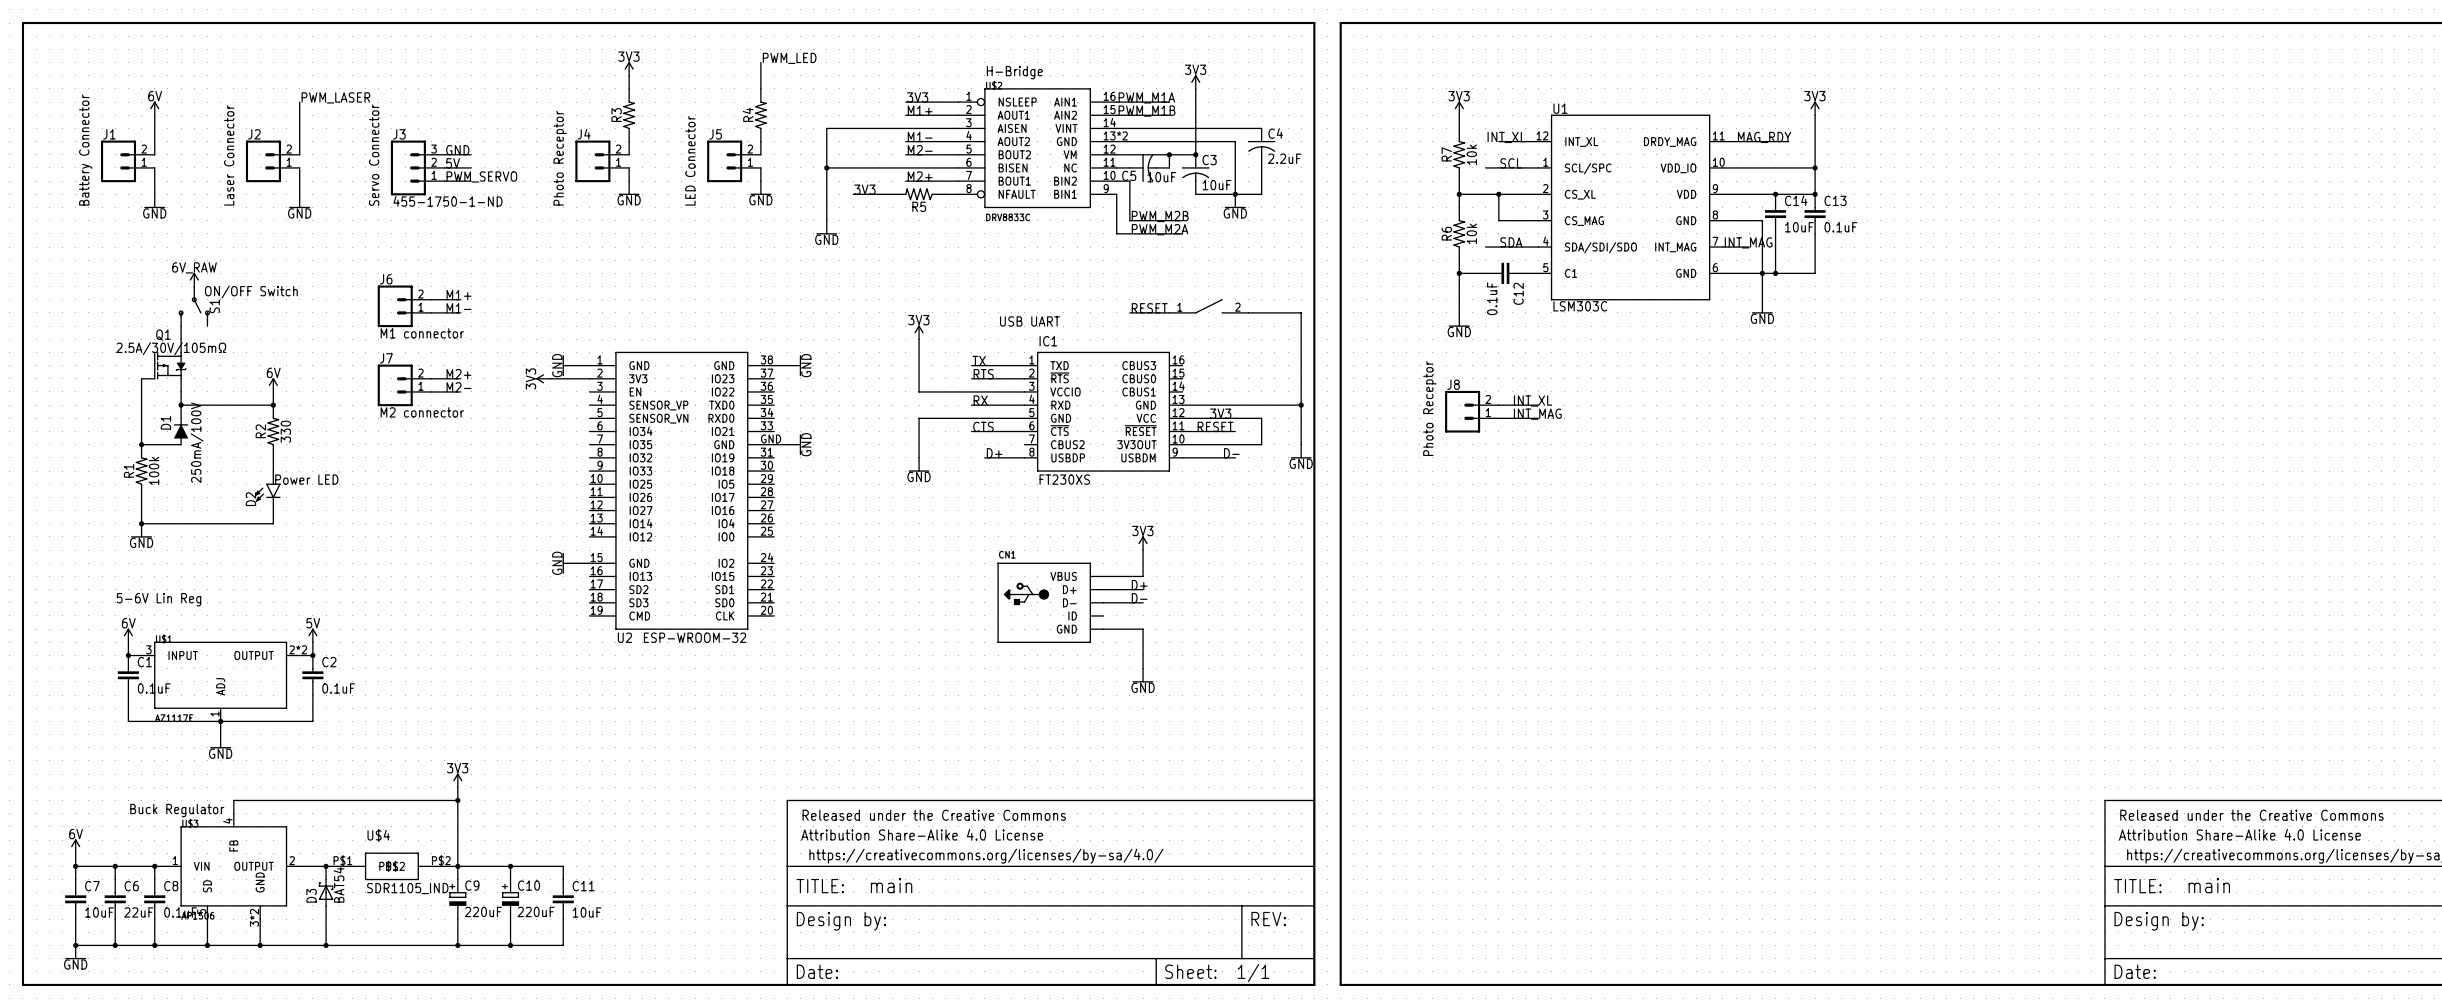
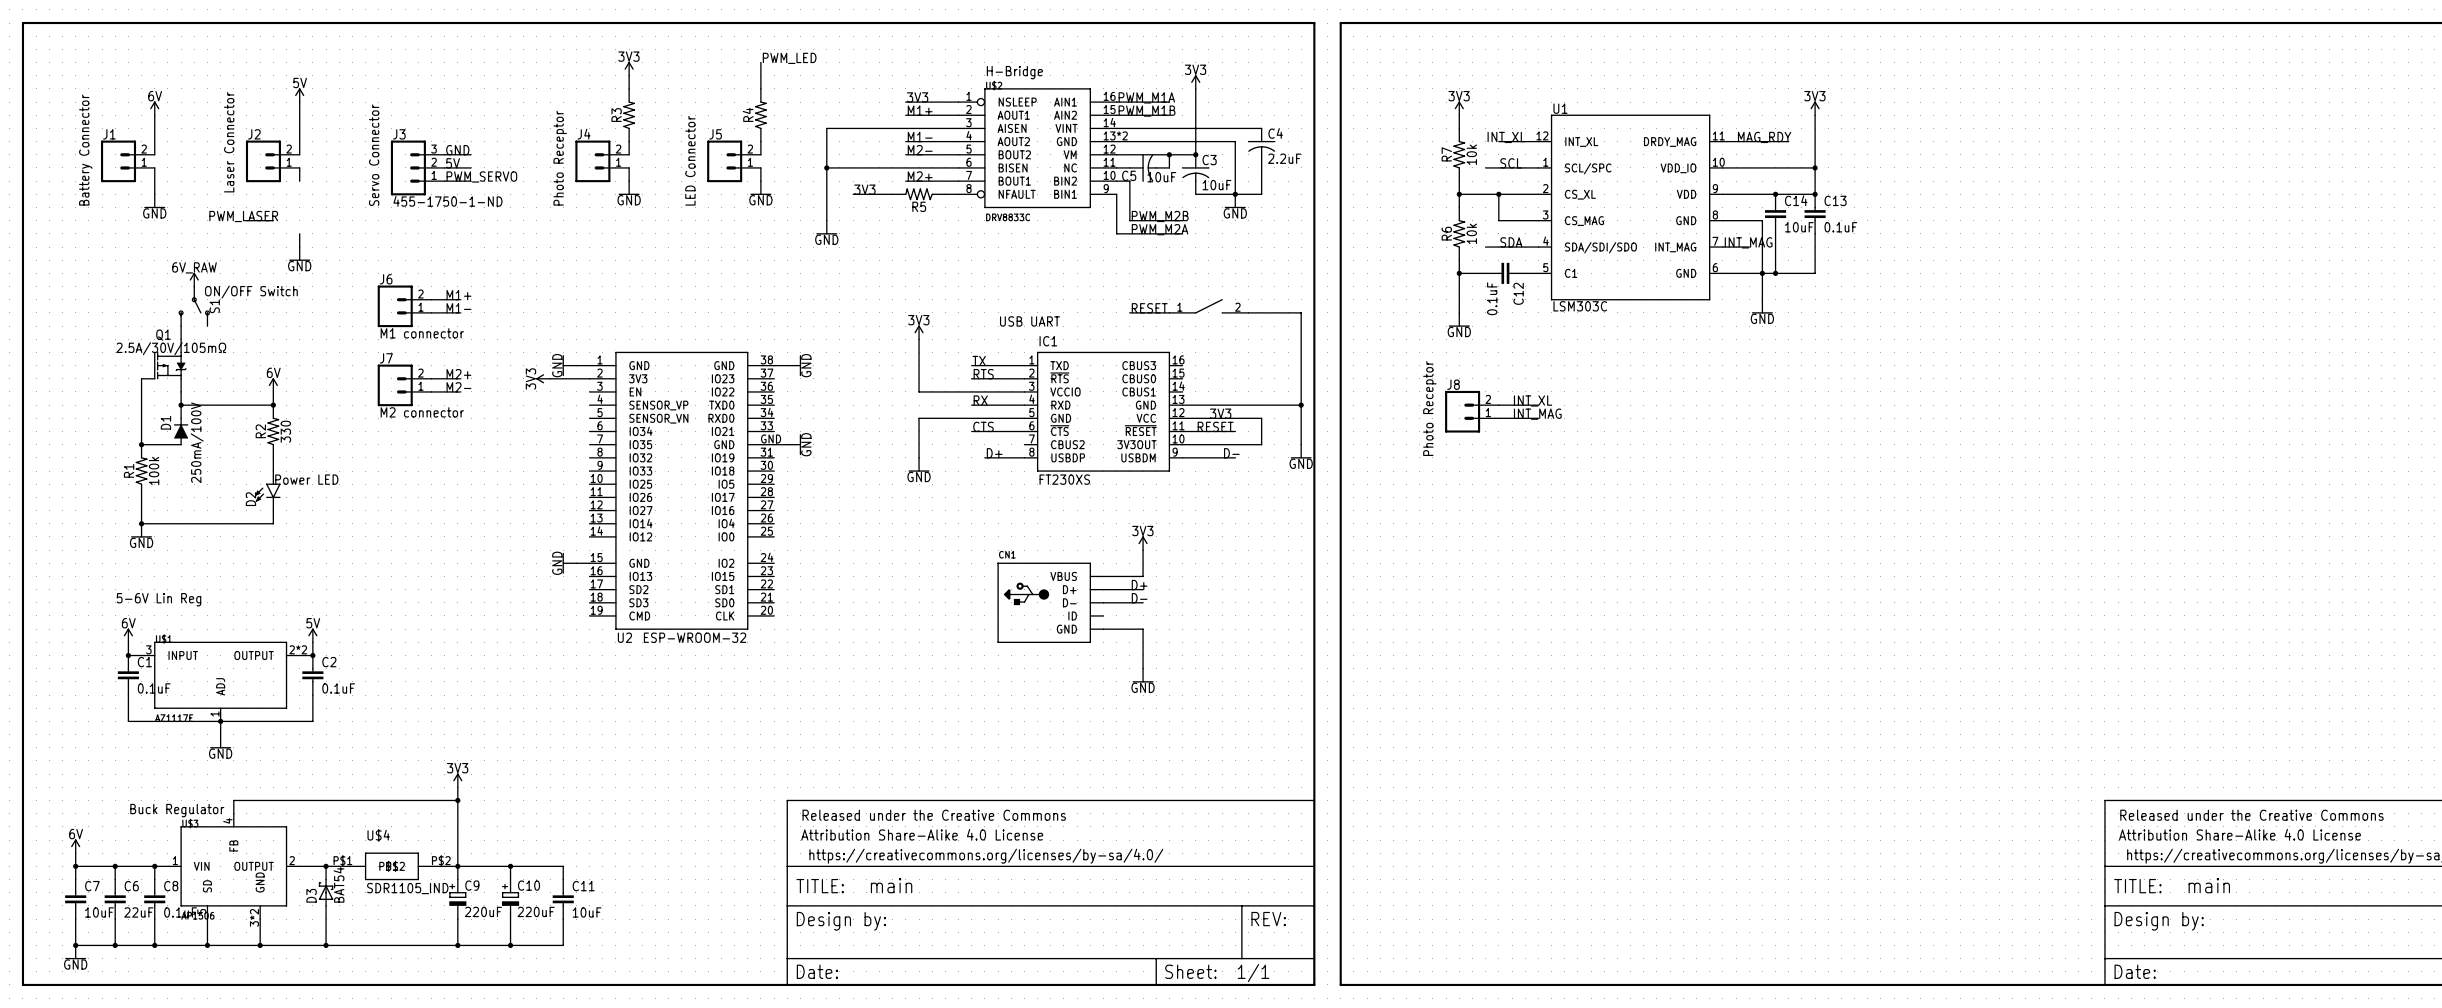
power symbol: none -> 5V (299, 95)
label: PWM_LASER (335, 97) -> none
J2 text position: Laser Connector (229, 155) -> Laser Connector (229, 142)
wire: (299, 181) (299, 194) -> (299, 233) (299, 247)
power symbol position: GND (299, 201) -> GND (299, 253)
label: none -> PWM_LASER (243, 216)
wire: none -> (246, 220) (273, 220)

